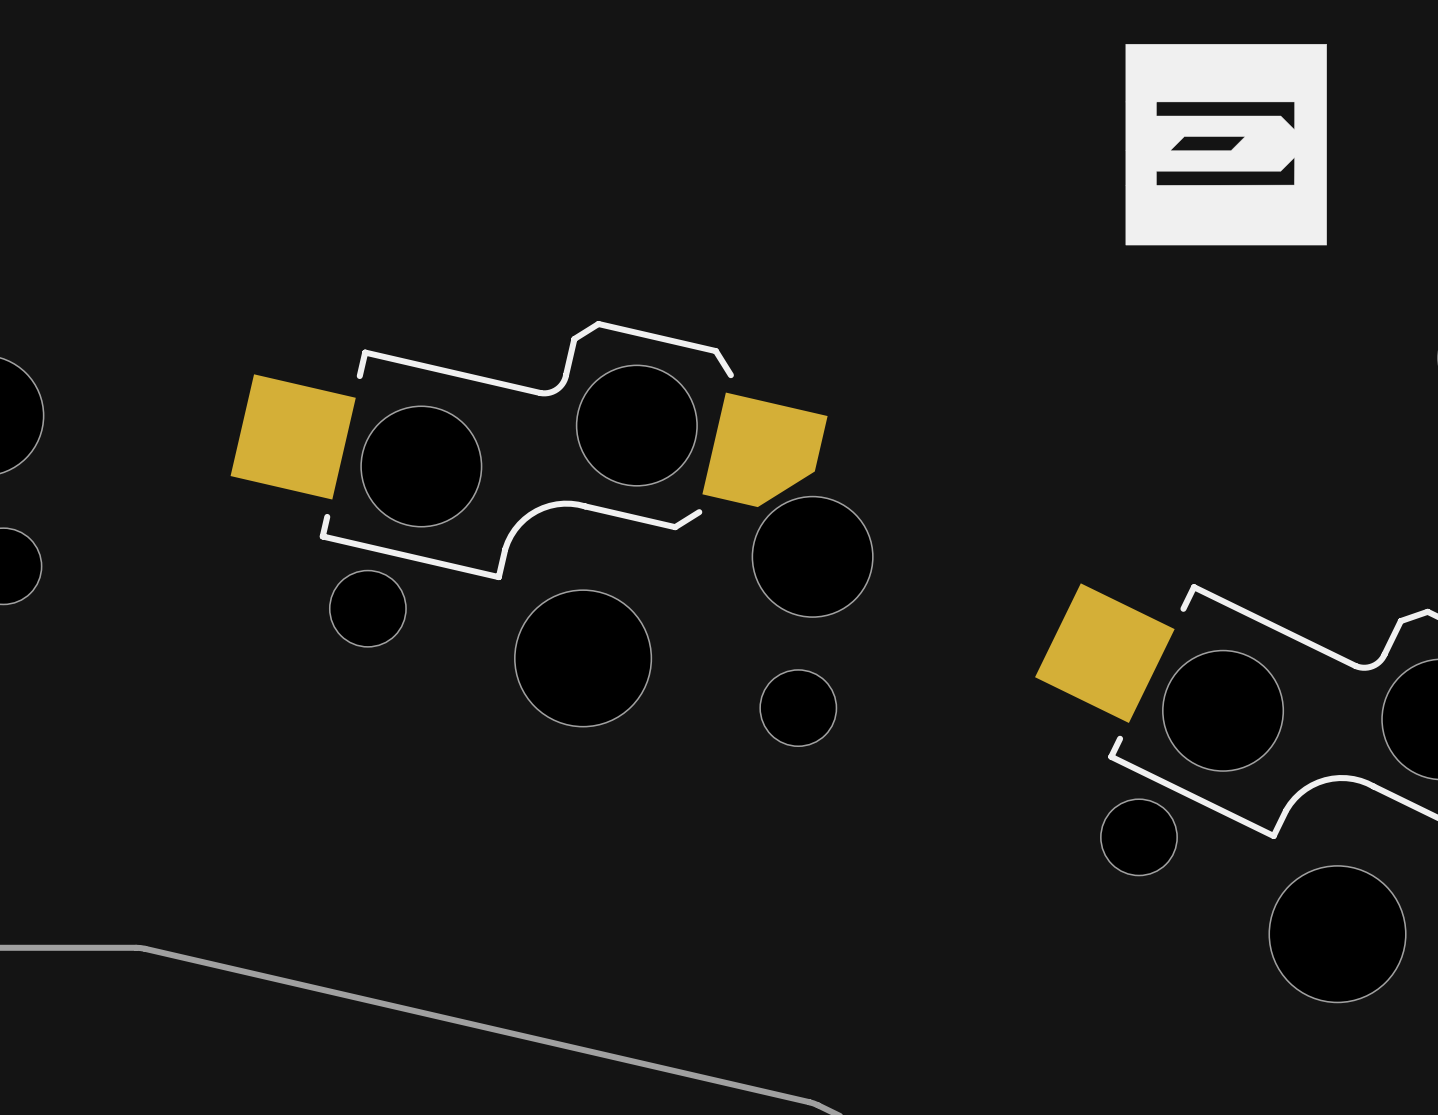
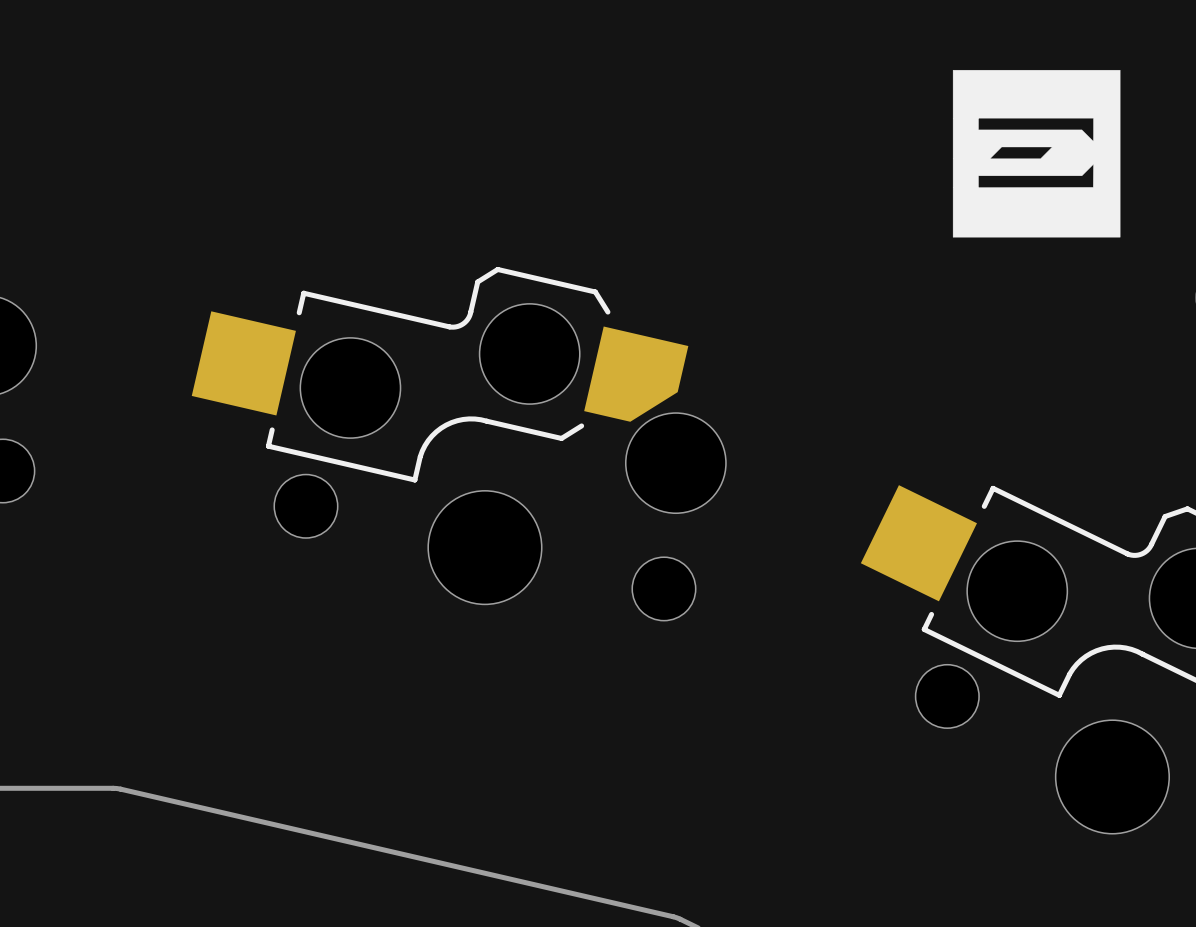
drawing position: (1226, 144) -> (1036, 153)

